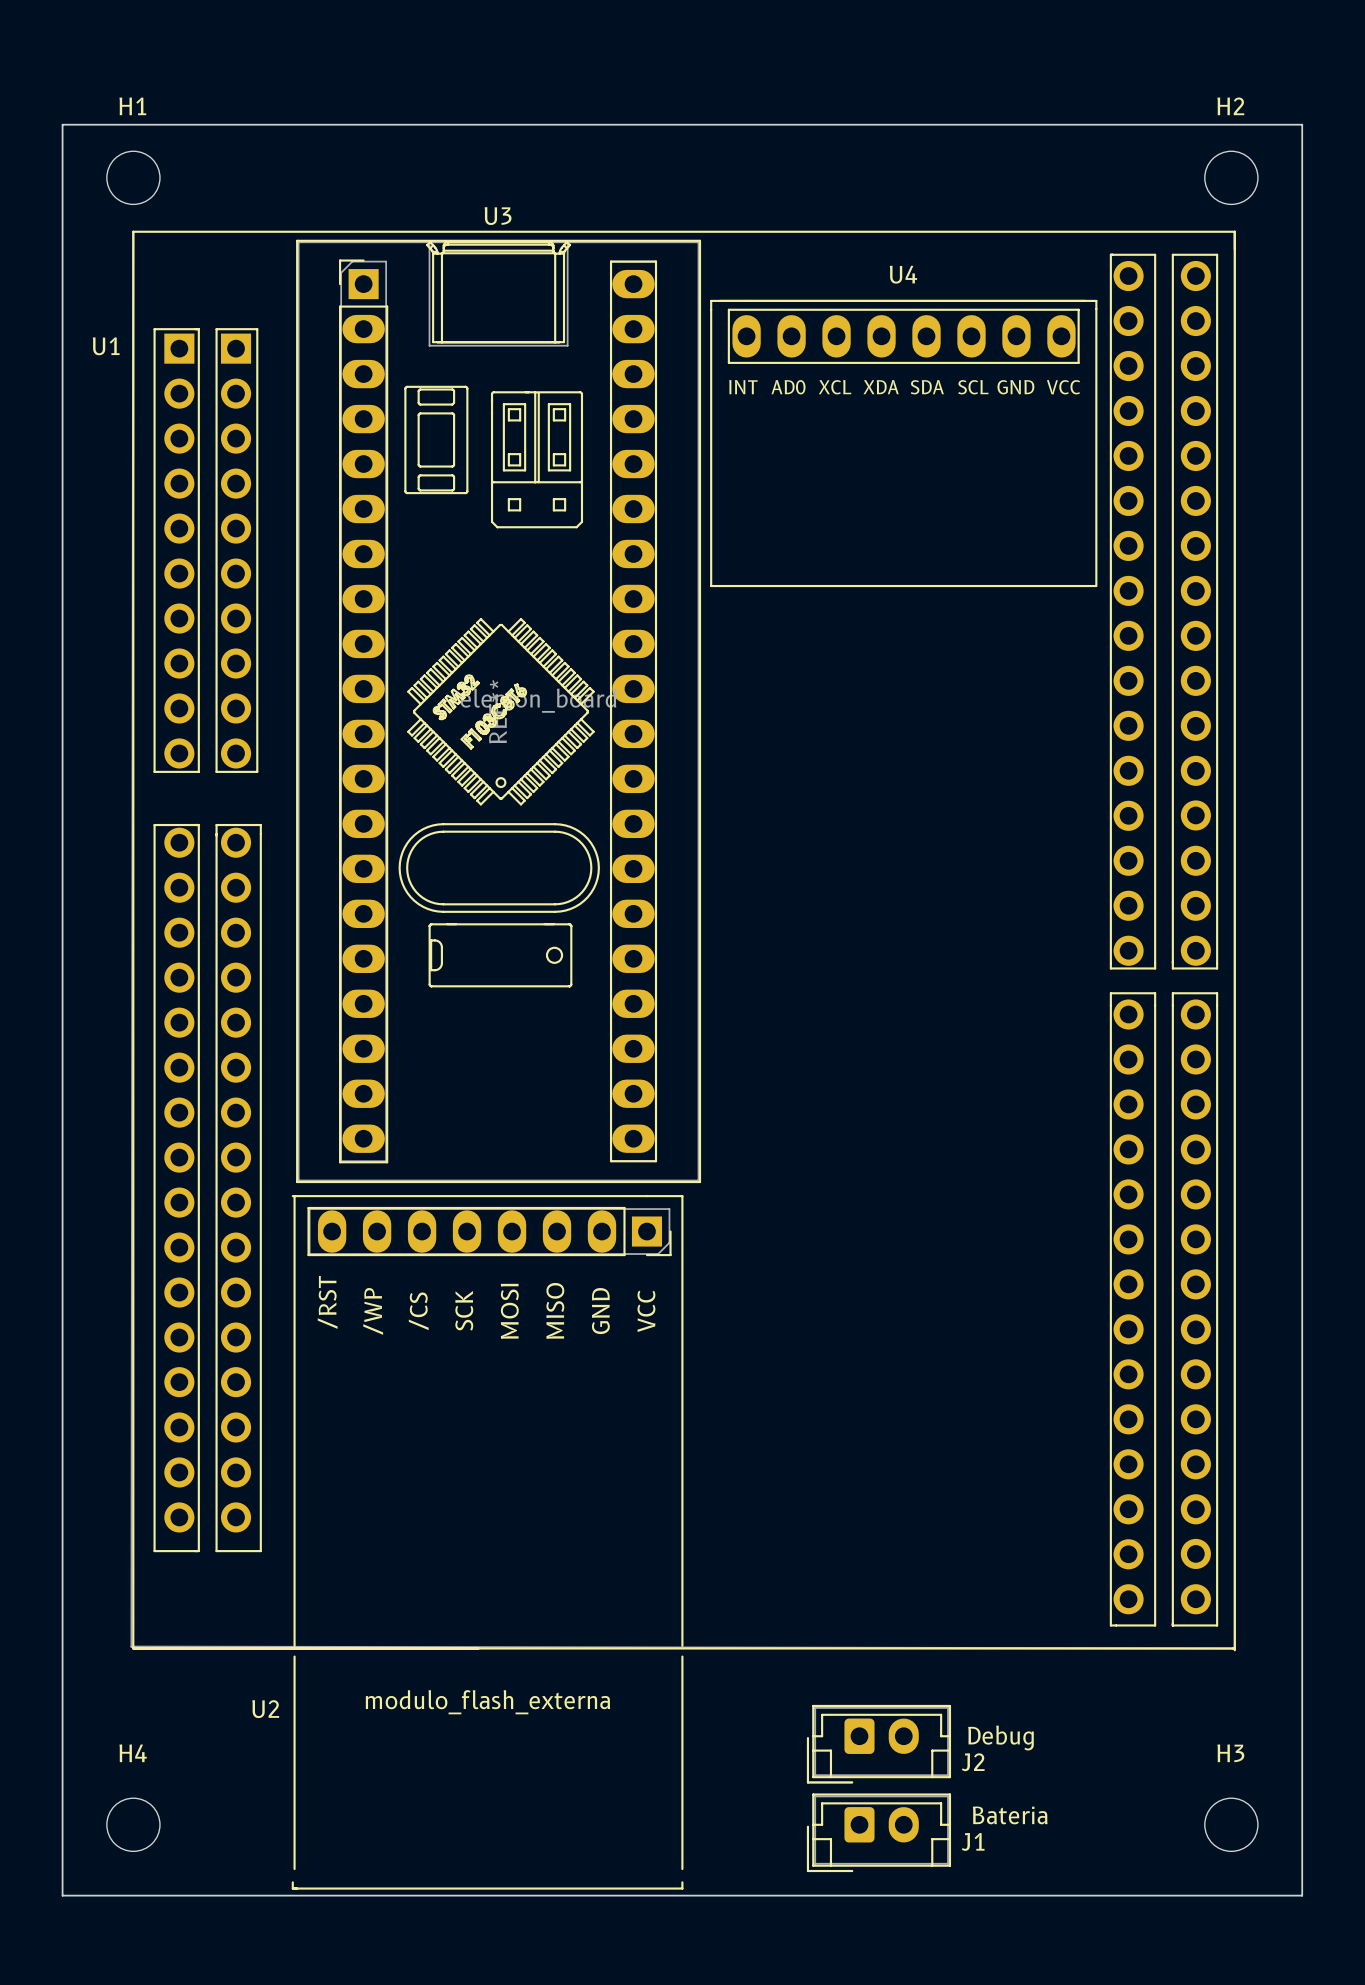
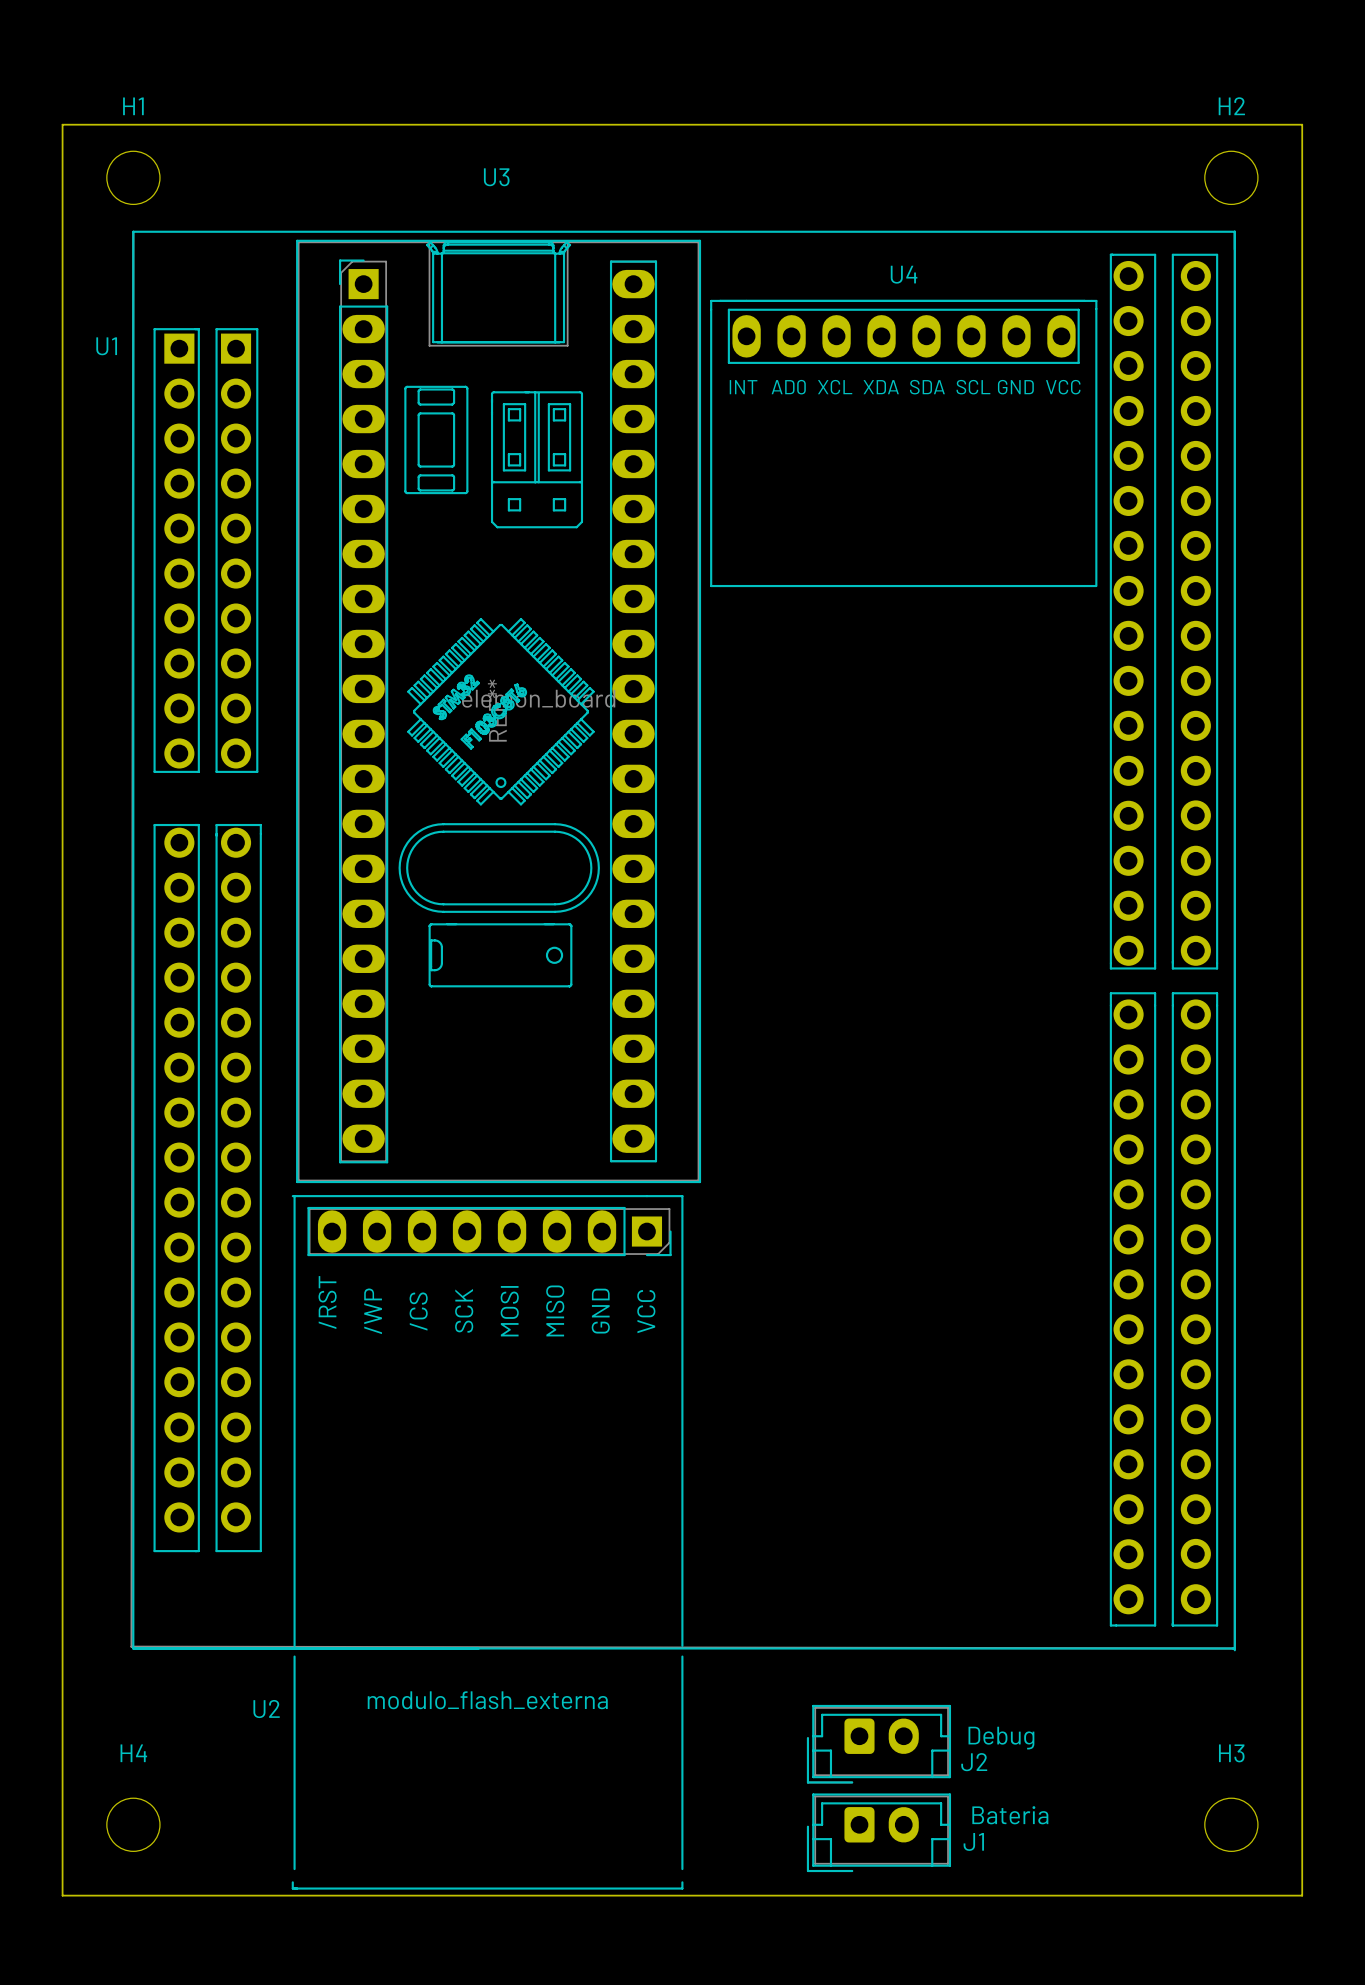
U3 name position: U3 (498, 216) -> U3 (496, 177)

